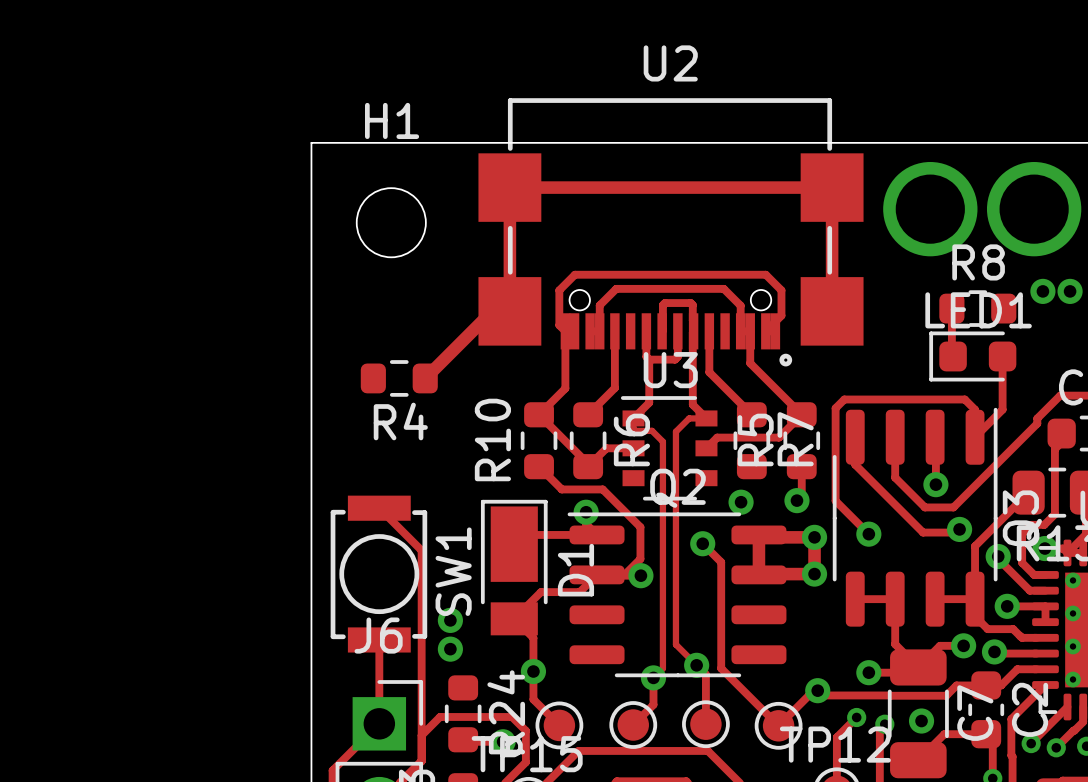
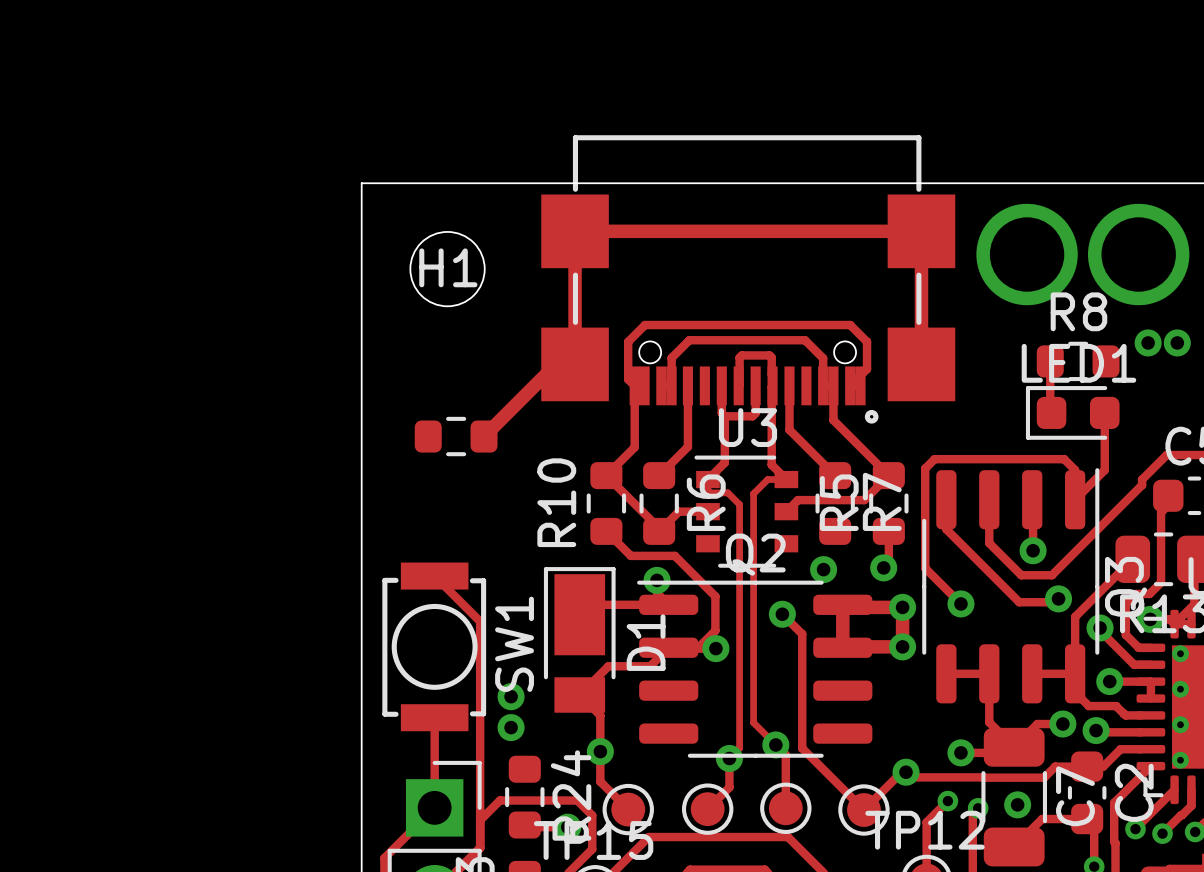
U2 name: U2 (670, 63) -> none
H1 name position: H1 (392, 120) -> H1 (448, 267)
R4 name: R4 (400, 421) -> none
J6 name: J6 (378, 635) -> none

